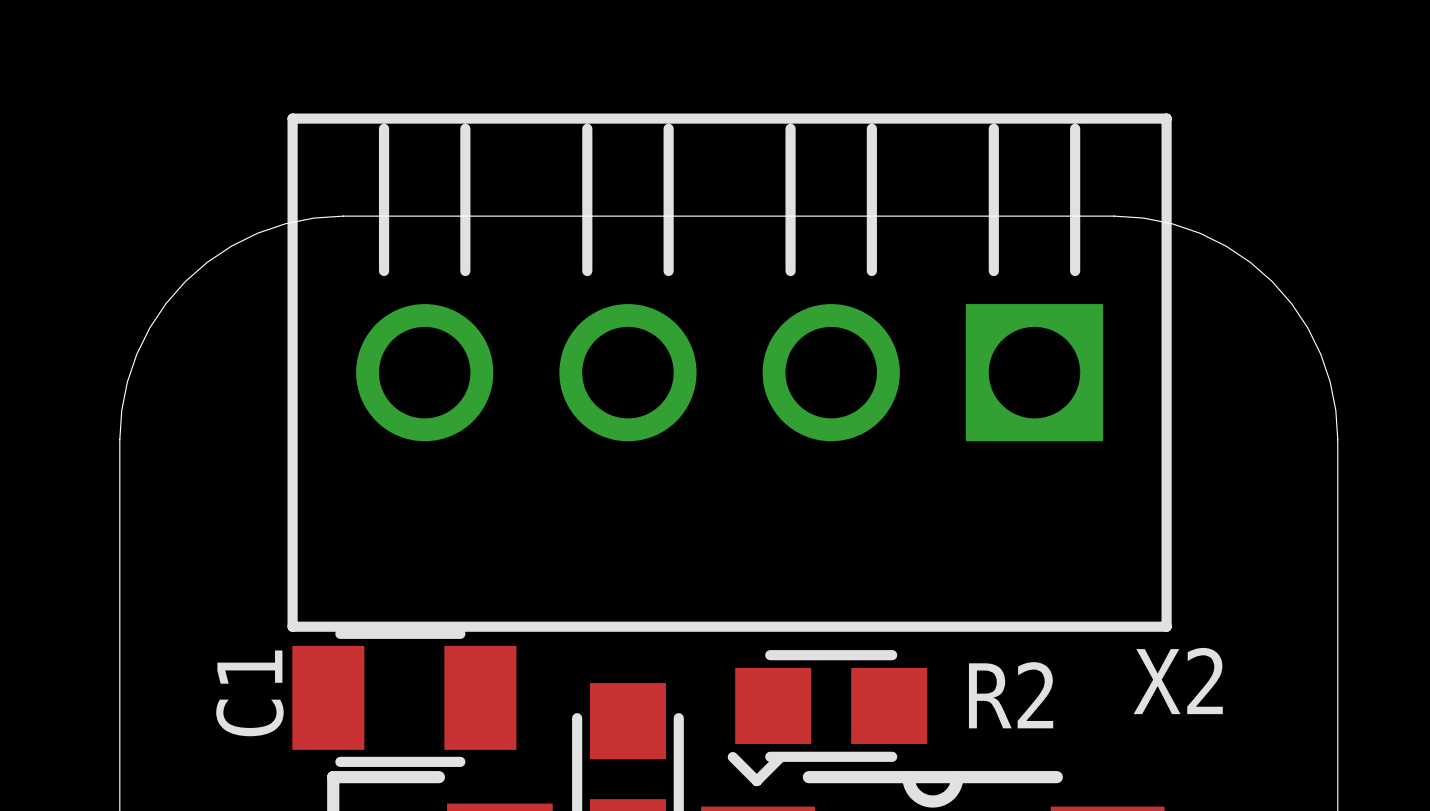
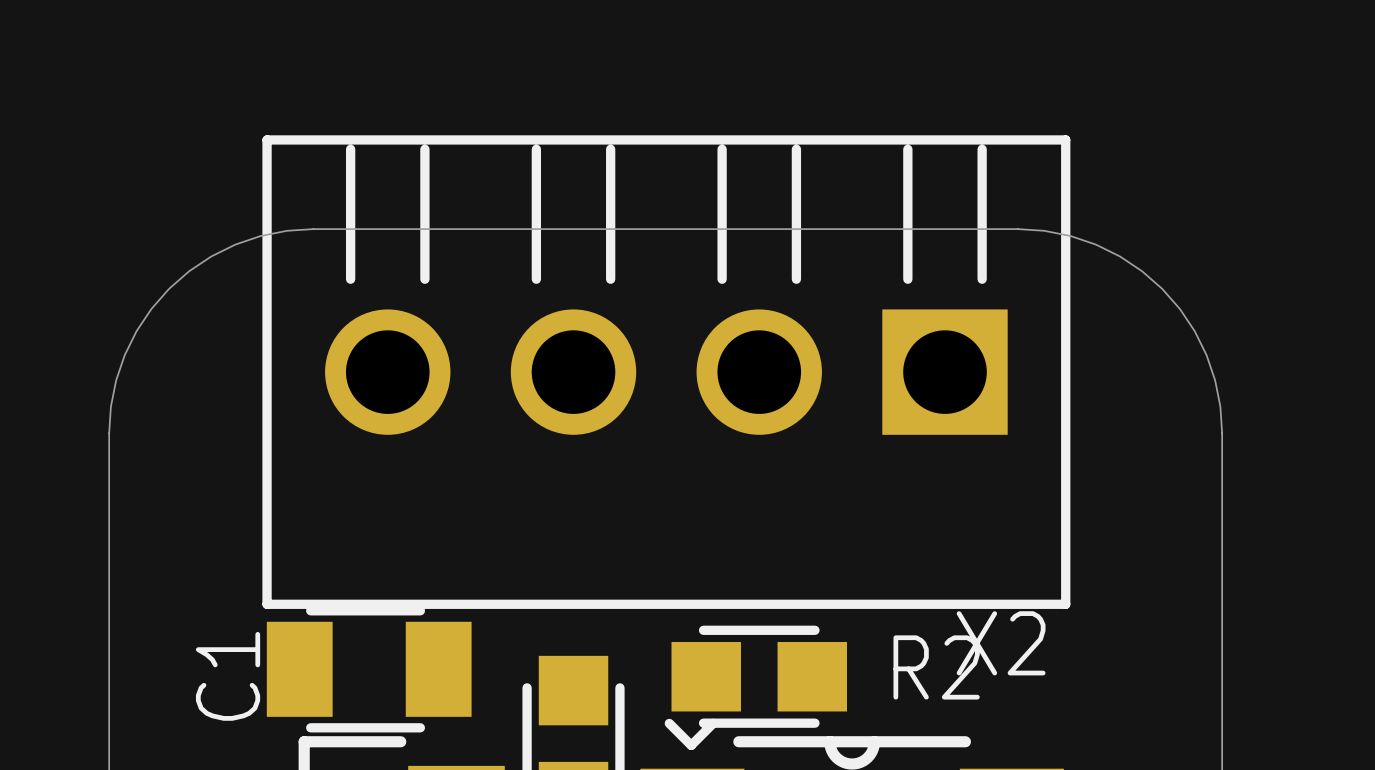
X2 name position: X2 (1178, 681) -> X2 (1001, 643)

